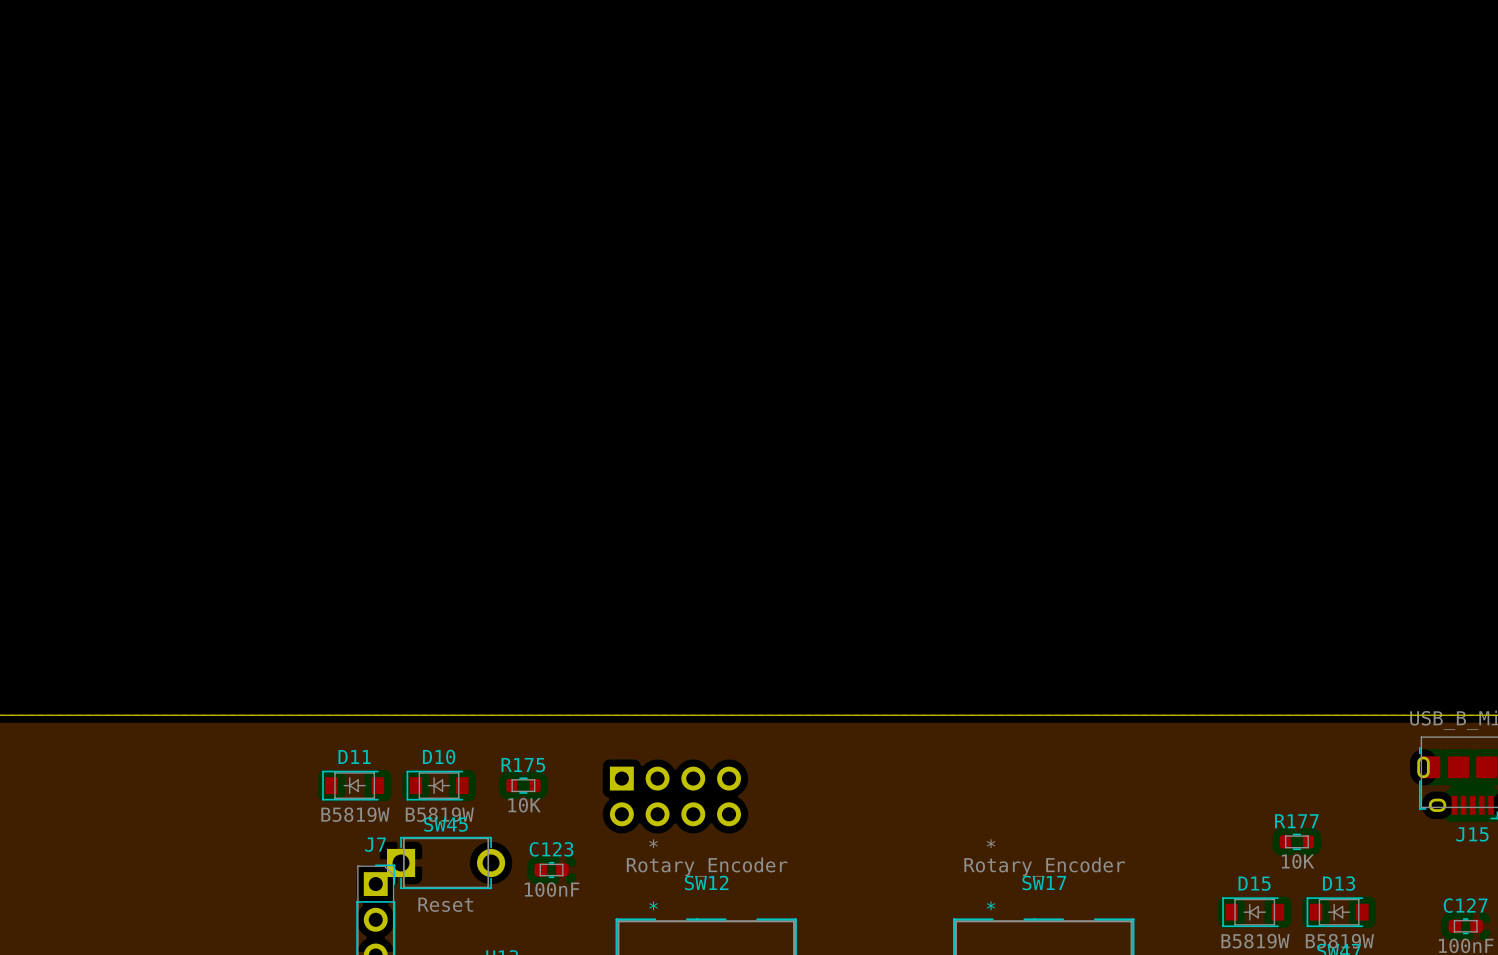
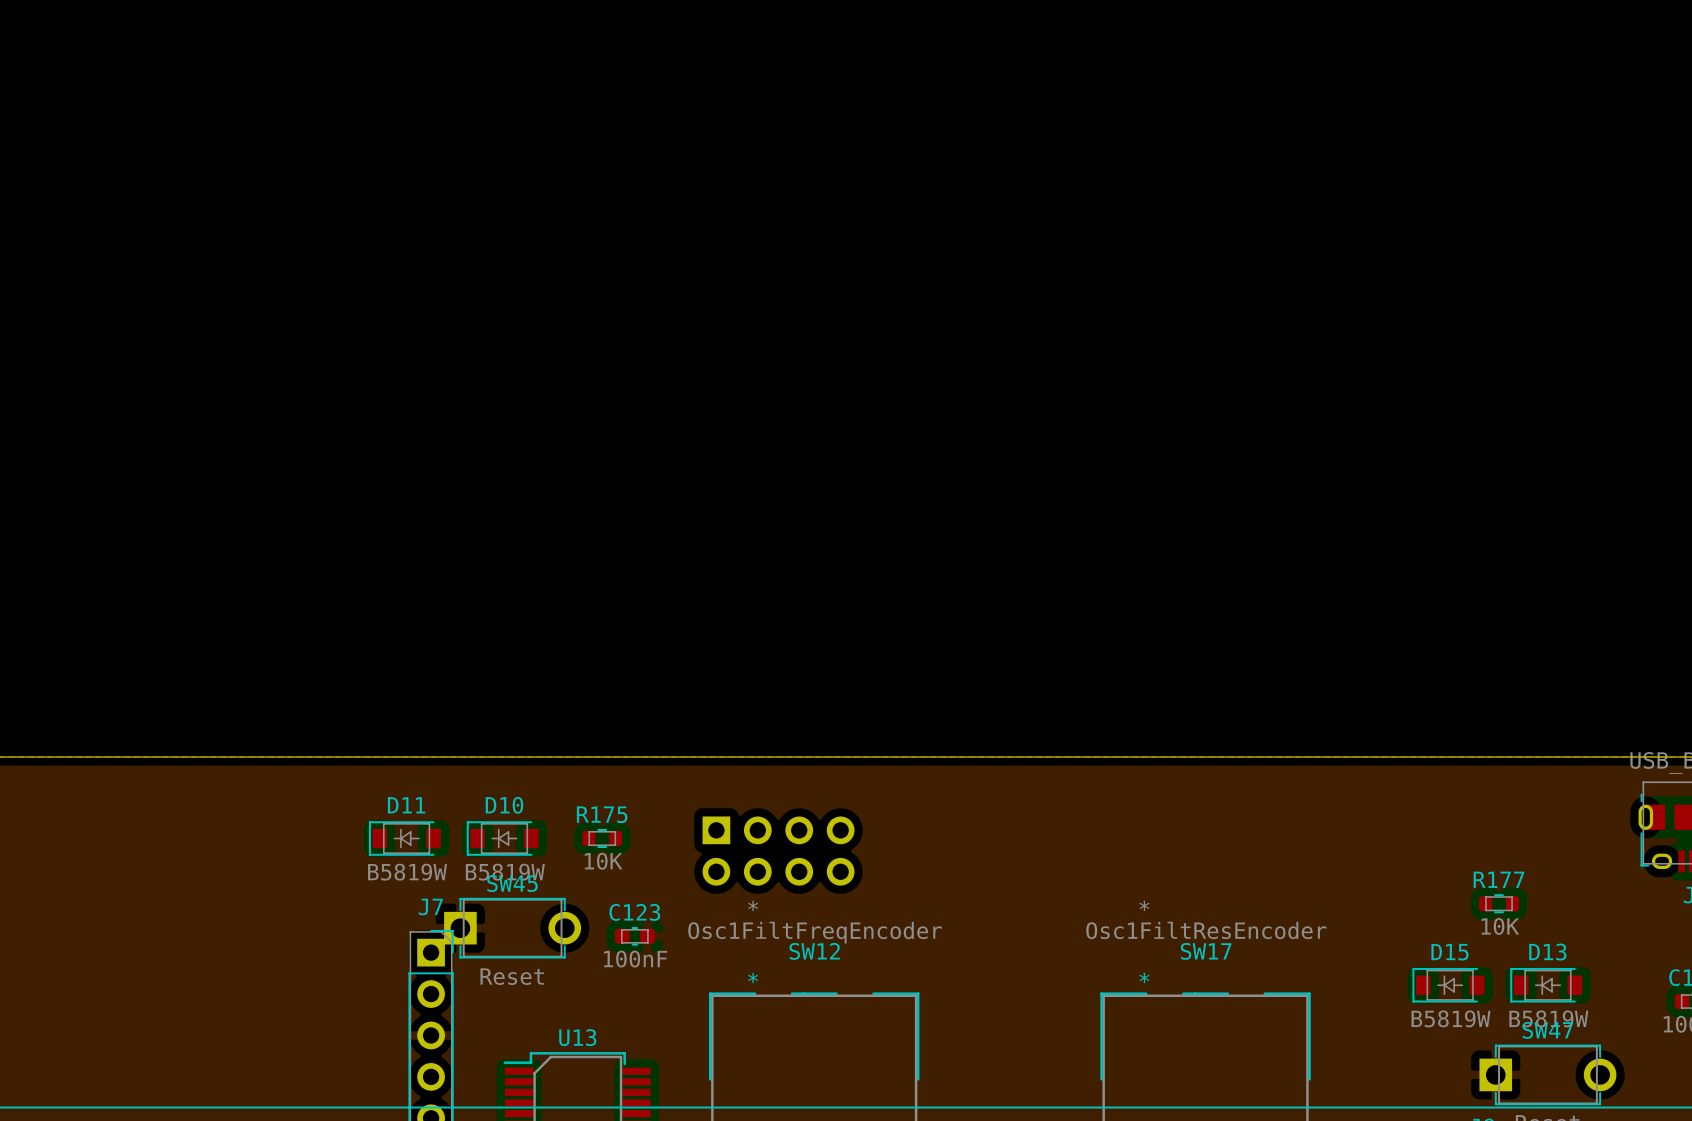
SW12 value: Rotary_Encoder (707, 867) -> Osc1FiltFreqEncoder (815, 932)
SW17 value: Rotary_Encoder (1044, 867) -> Osc1FiltResEncoder (1206, 930)

